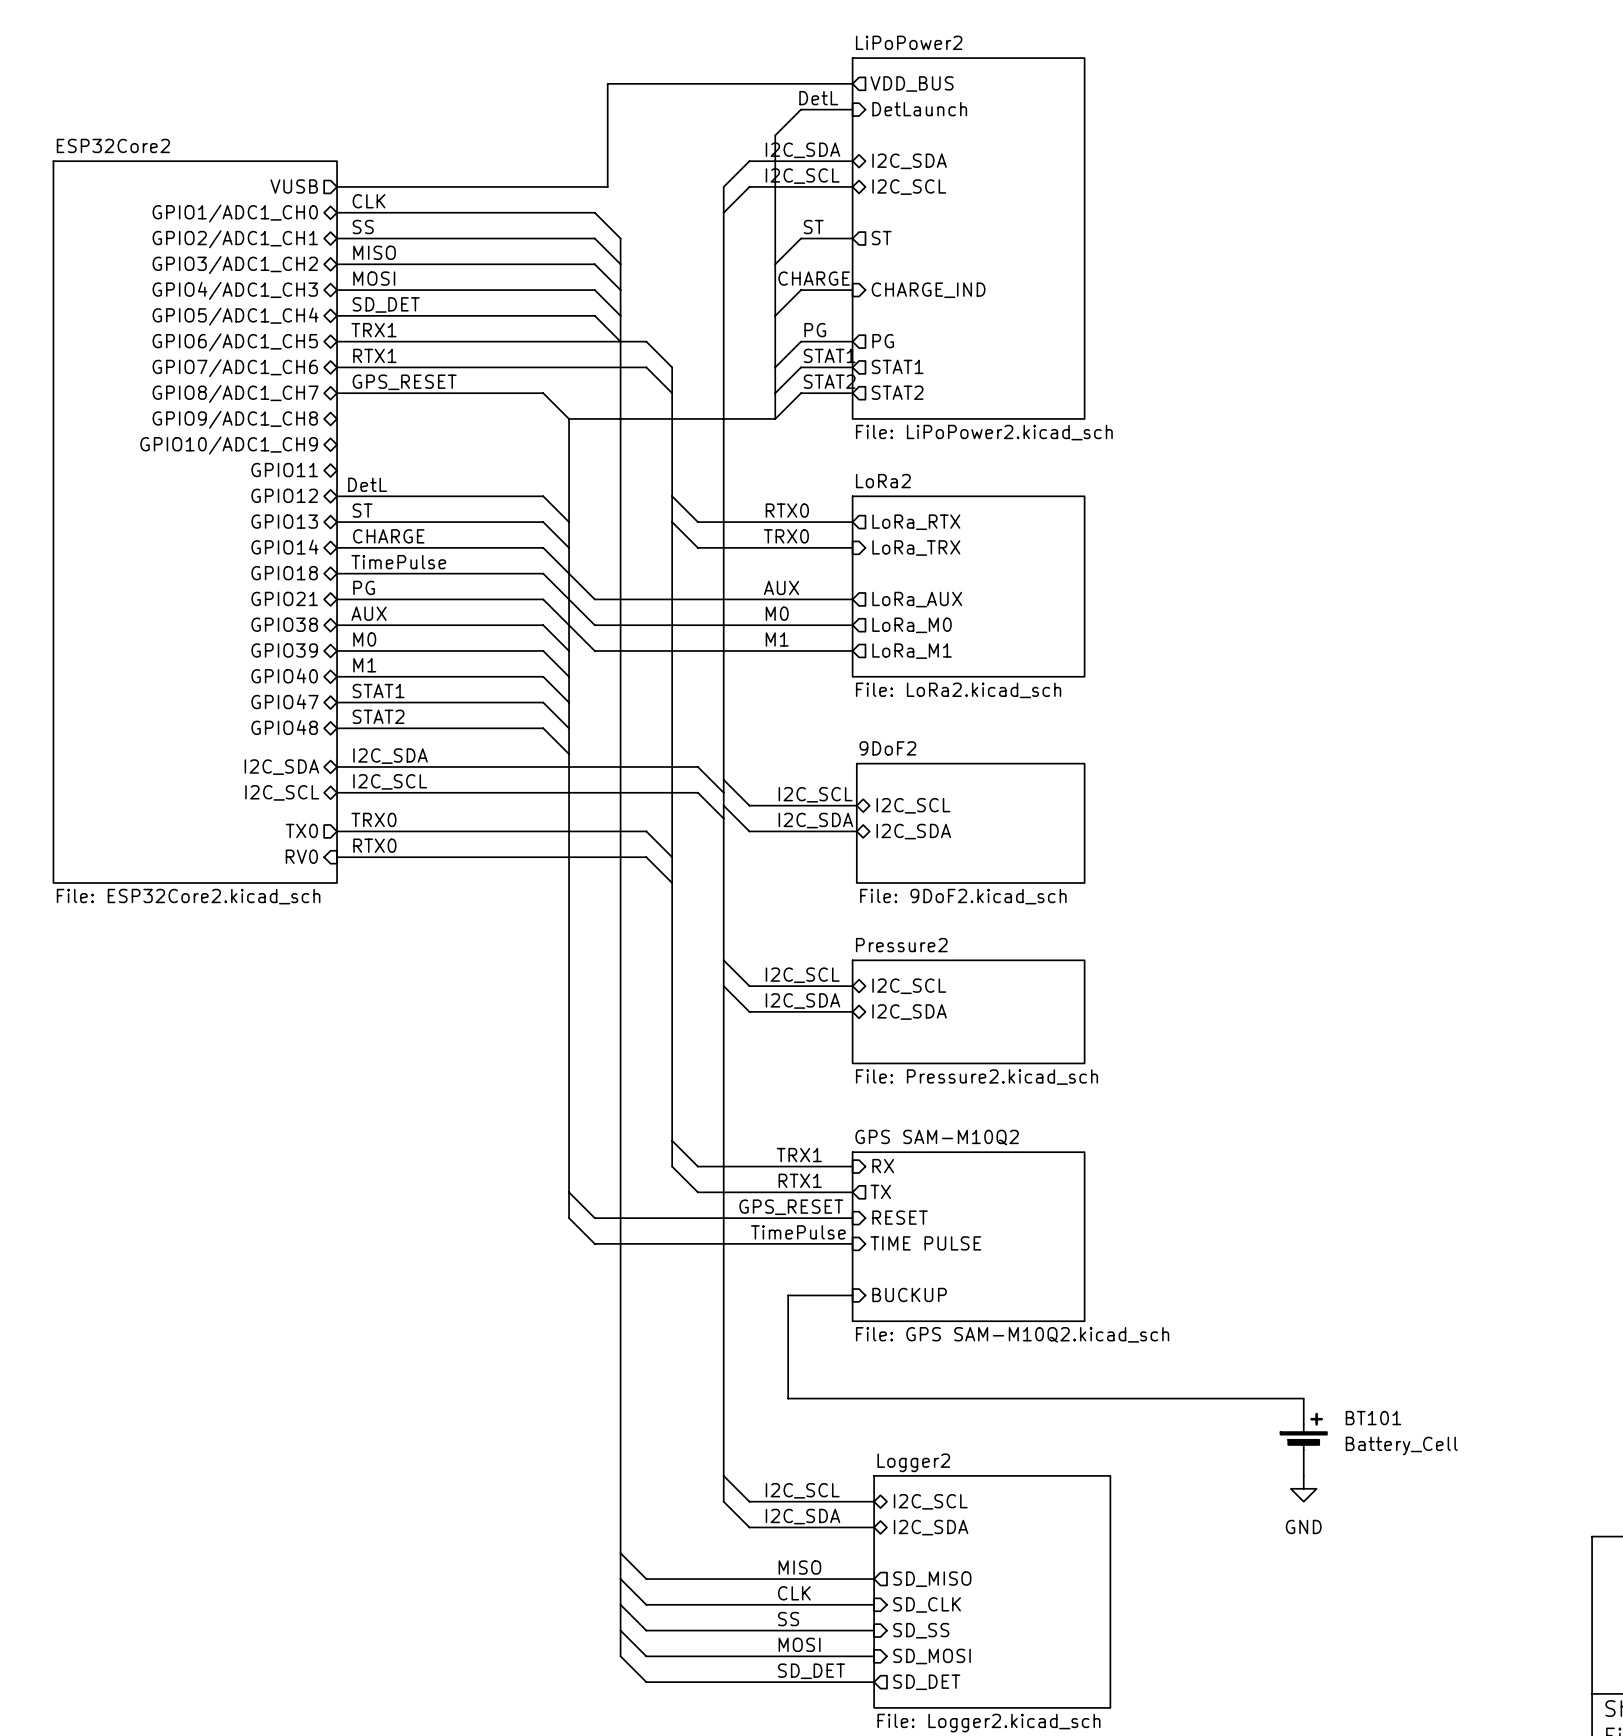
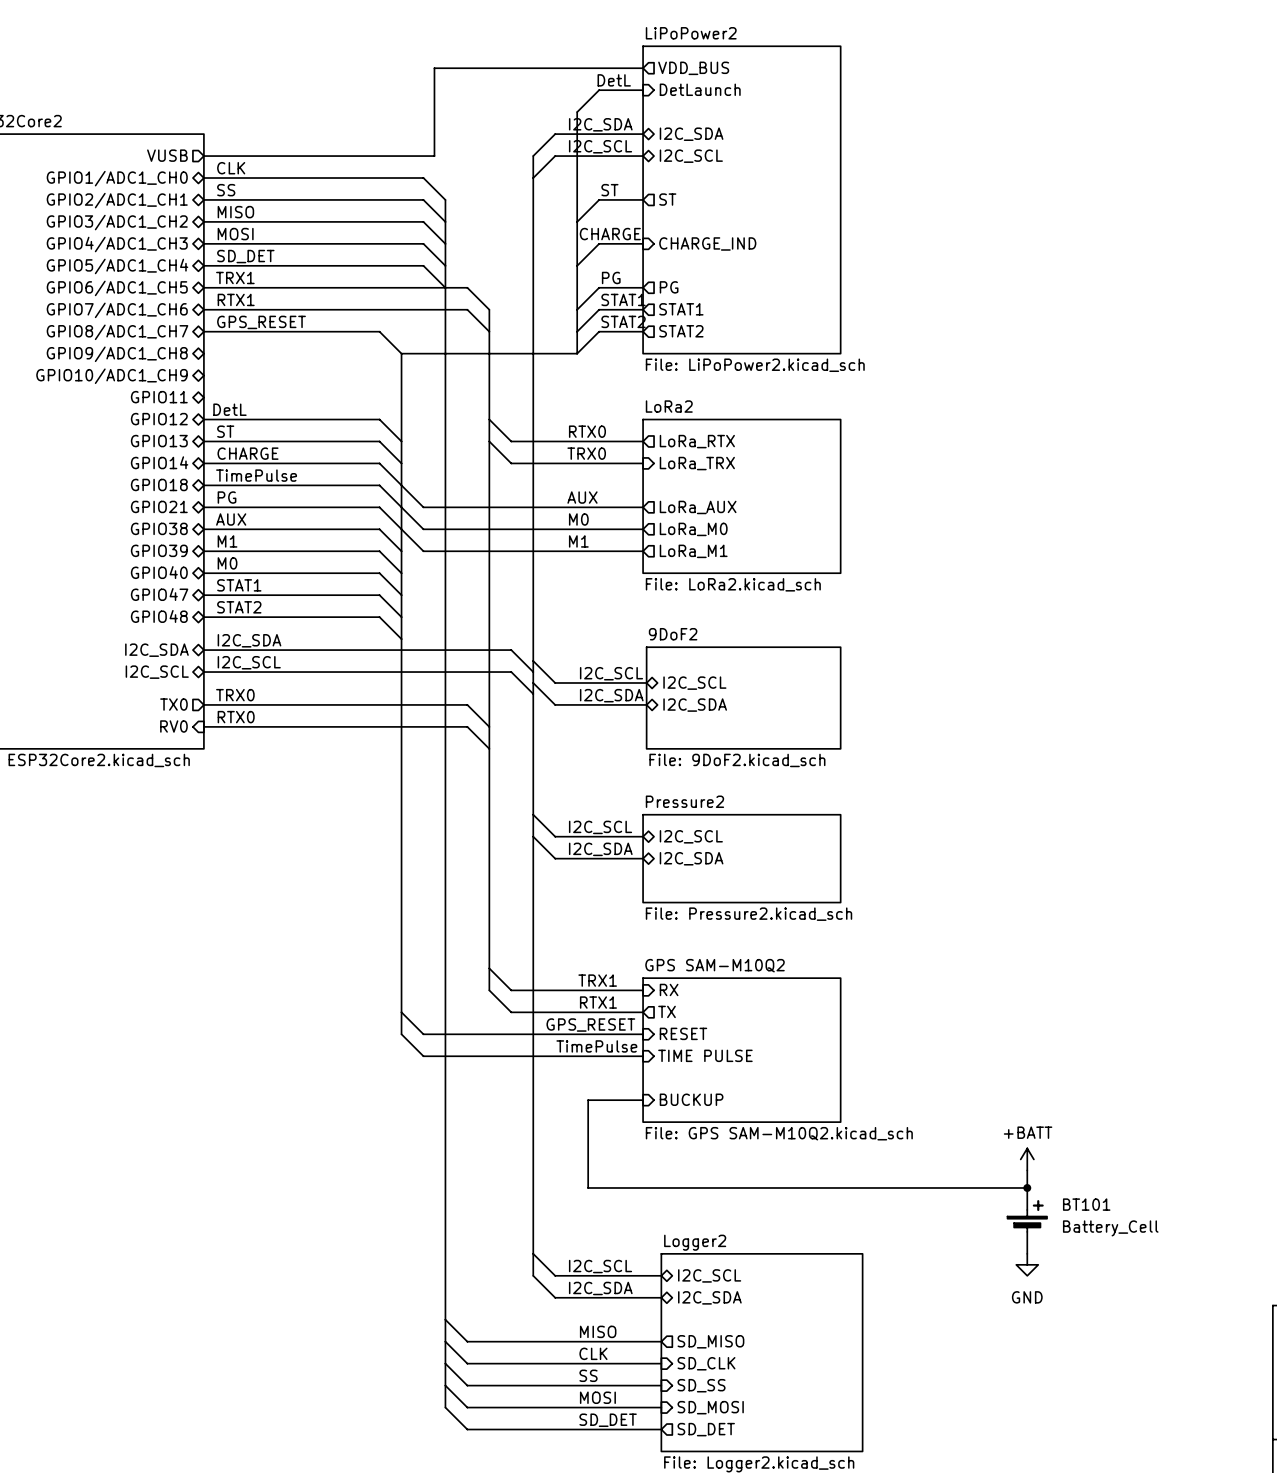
label: M0 (364, 639) -> M1 (227, 541)
label: M1 (364, 665) -> M0 (227, 563)
power symbol: none -> +BATT (1027, 1159)
wire: none -> (1027, 1170) (1027, 1187)
junction: none -> (1027, 1187)

